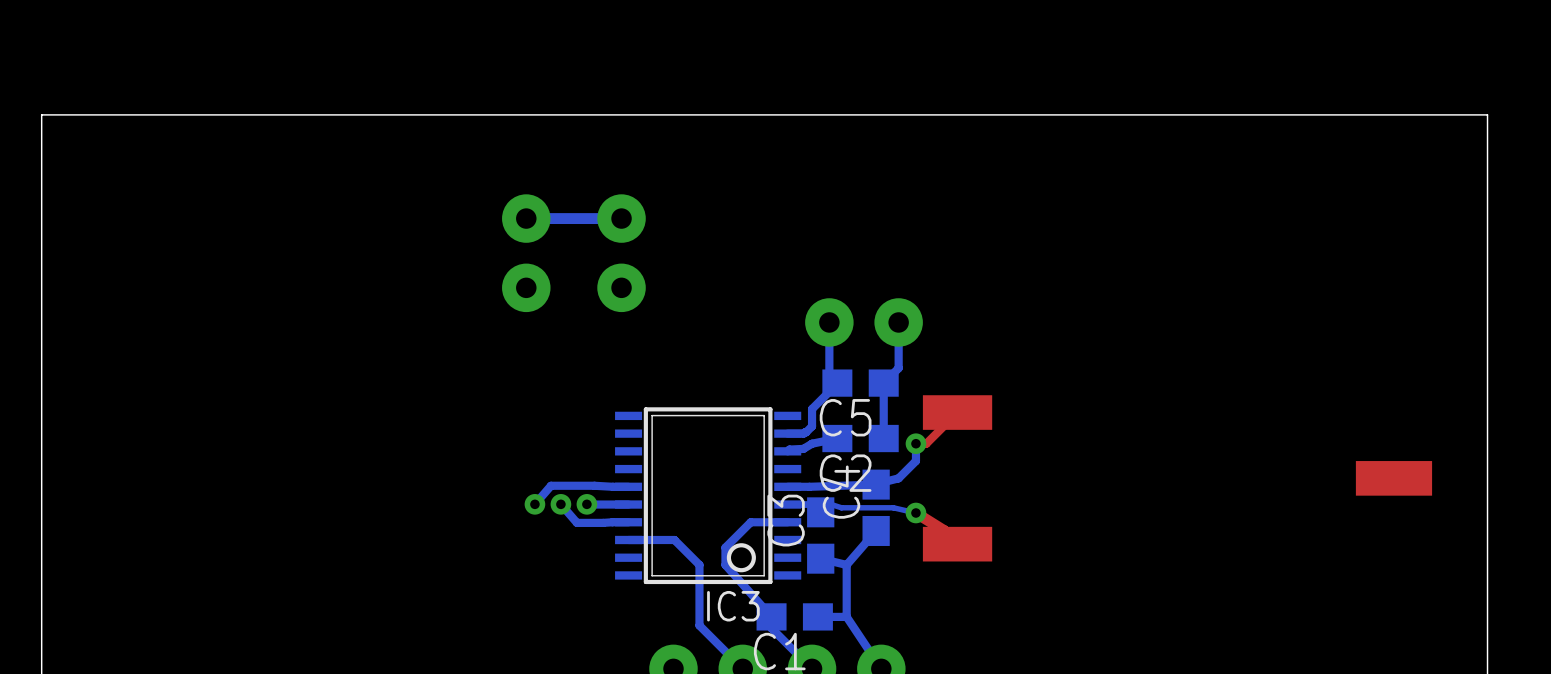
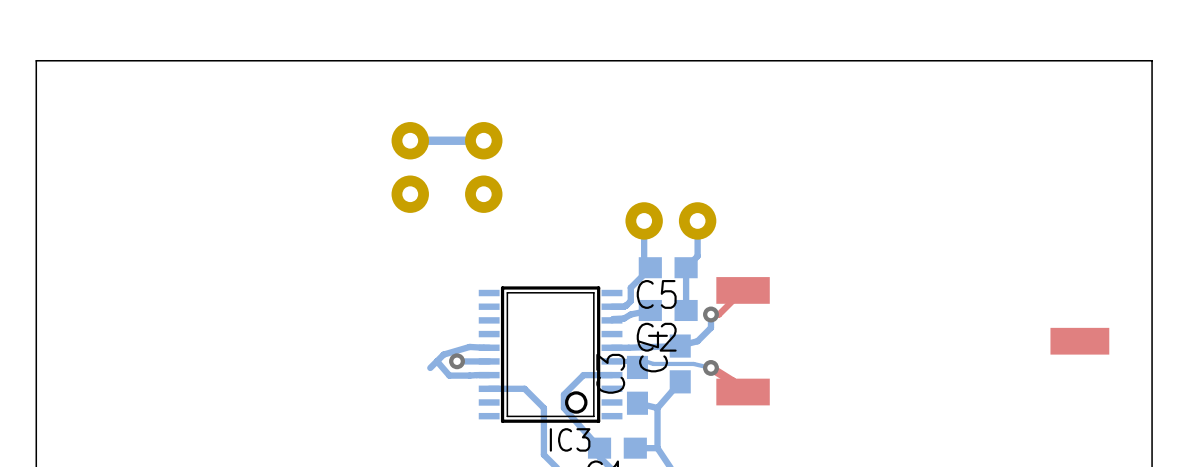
bottom track: (621, 486) (551, 485) (534, 504) -> (483, 347) (469, 346) (443, 354) (430, 367)
via: (534, 504) -> none
via: (560, 504) -> none

